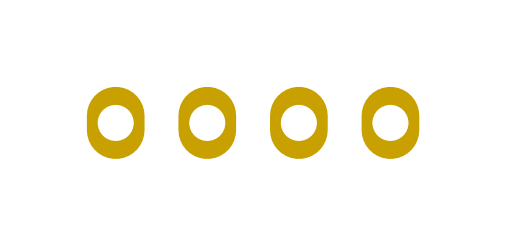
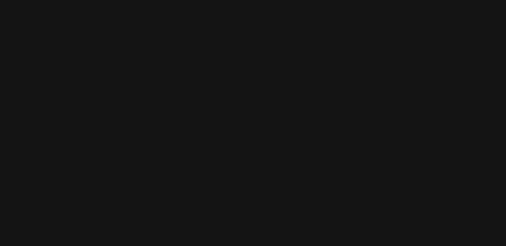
part: (253, 122) -> none

